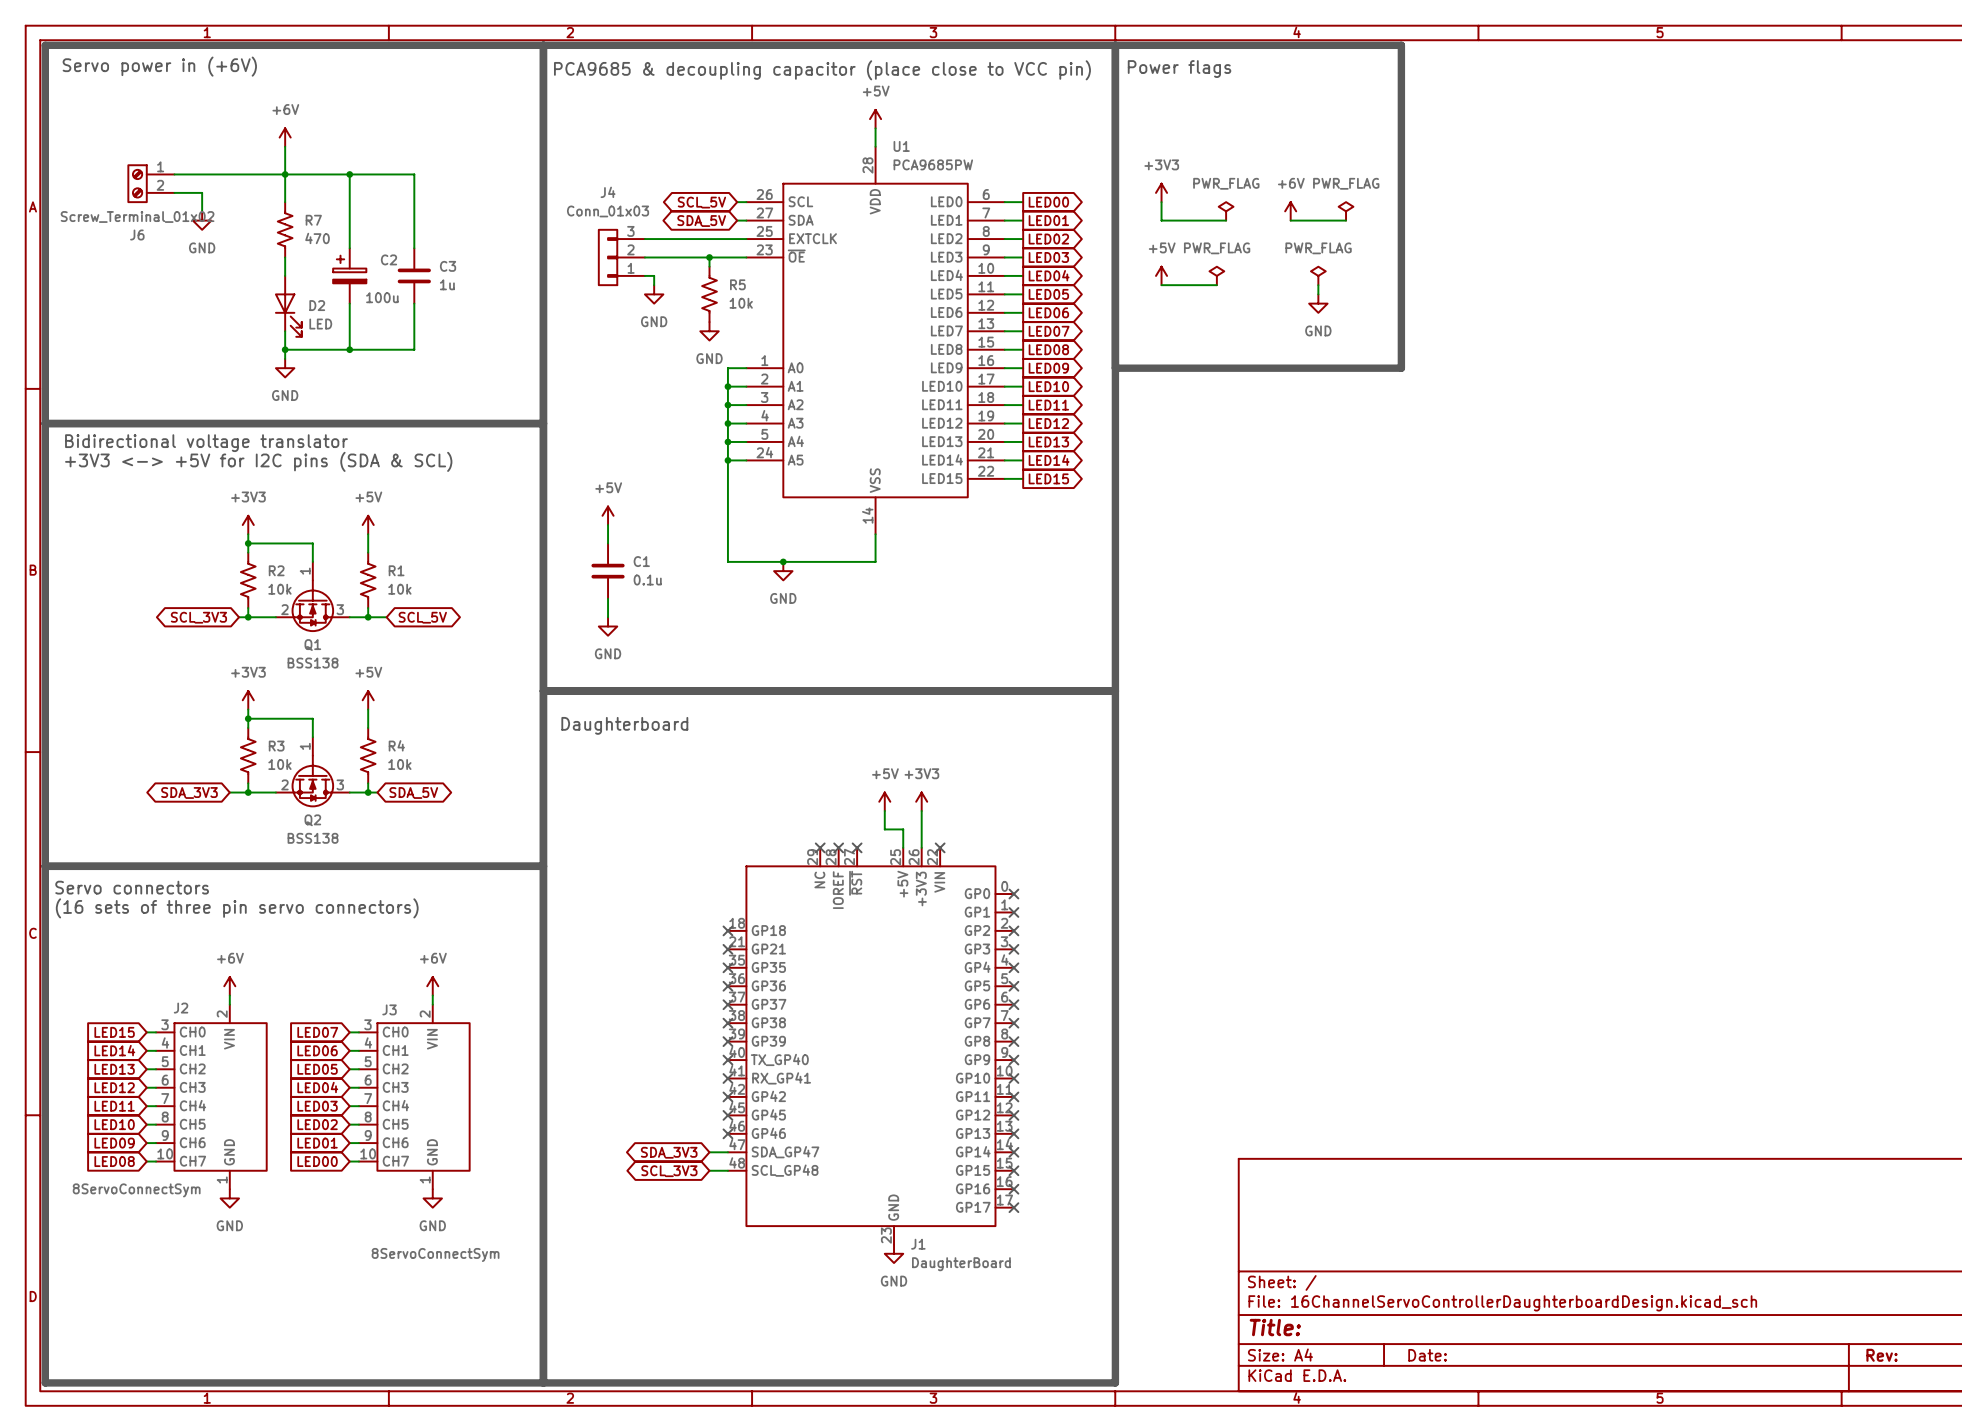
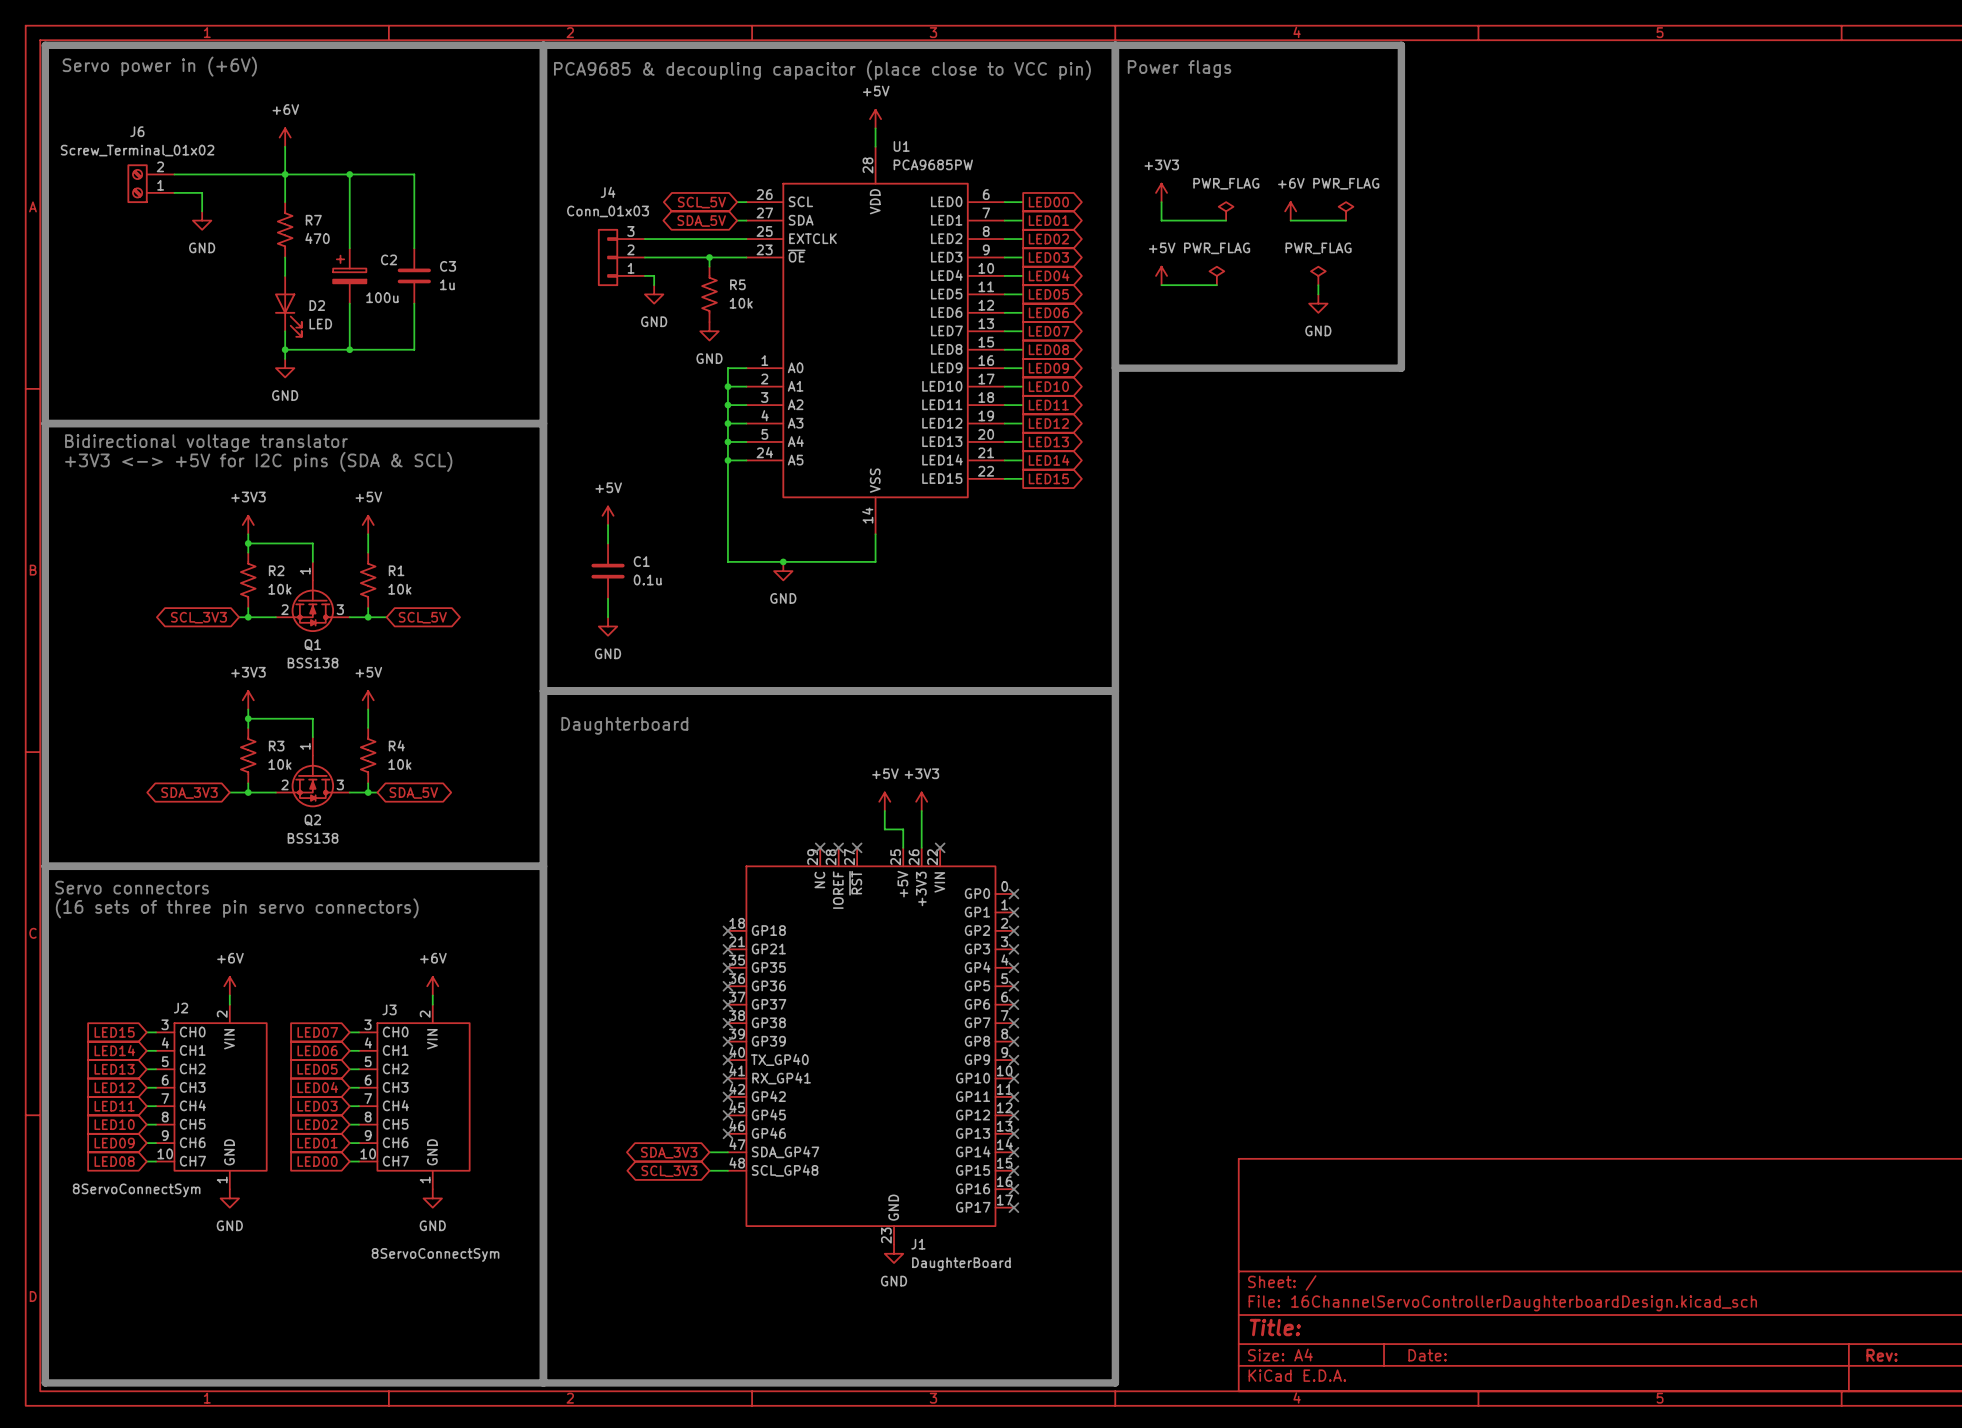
J6 flip: as is (137, 183) -> up-down (137, 183)

